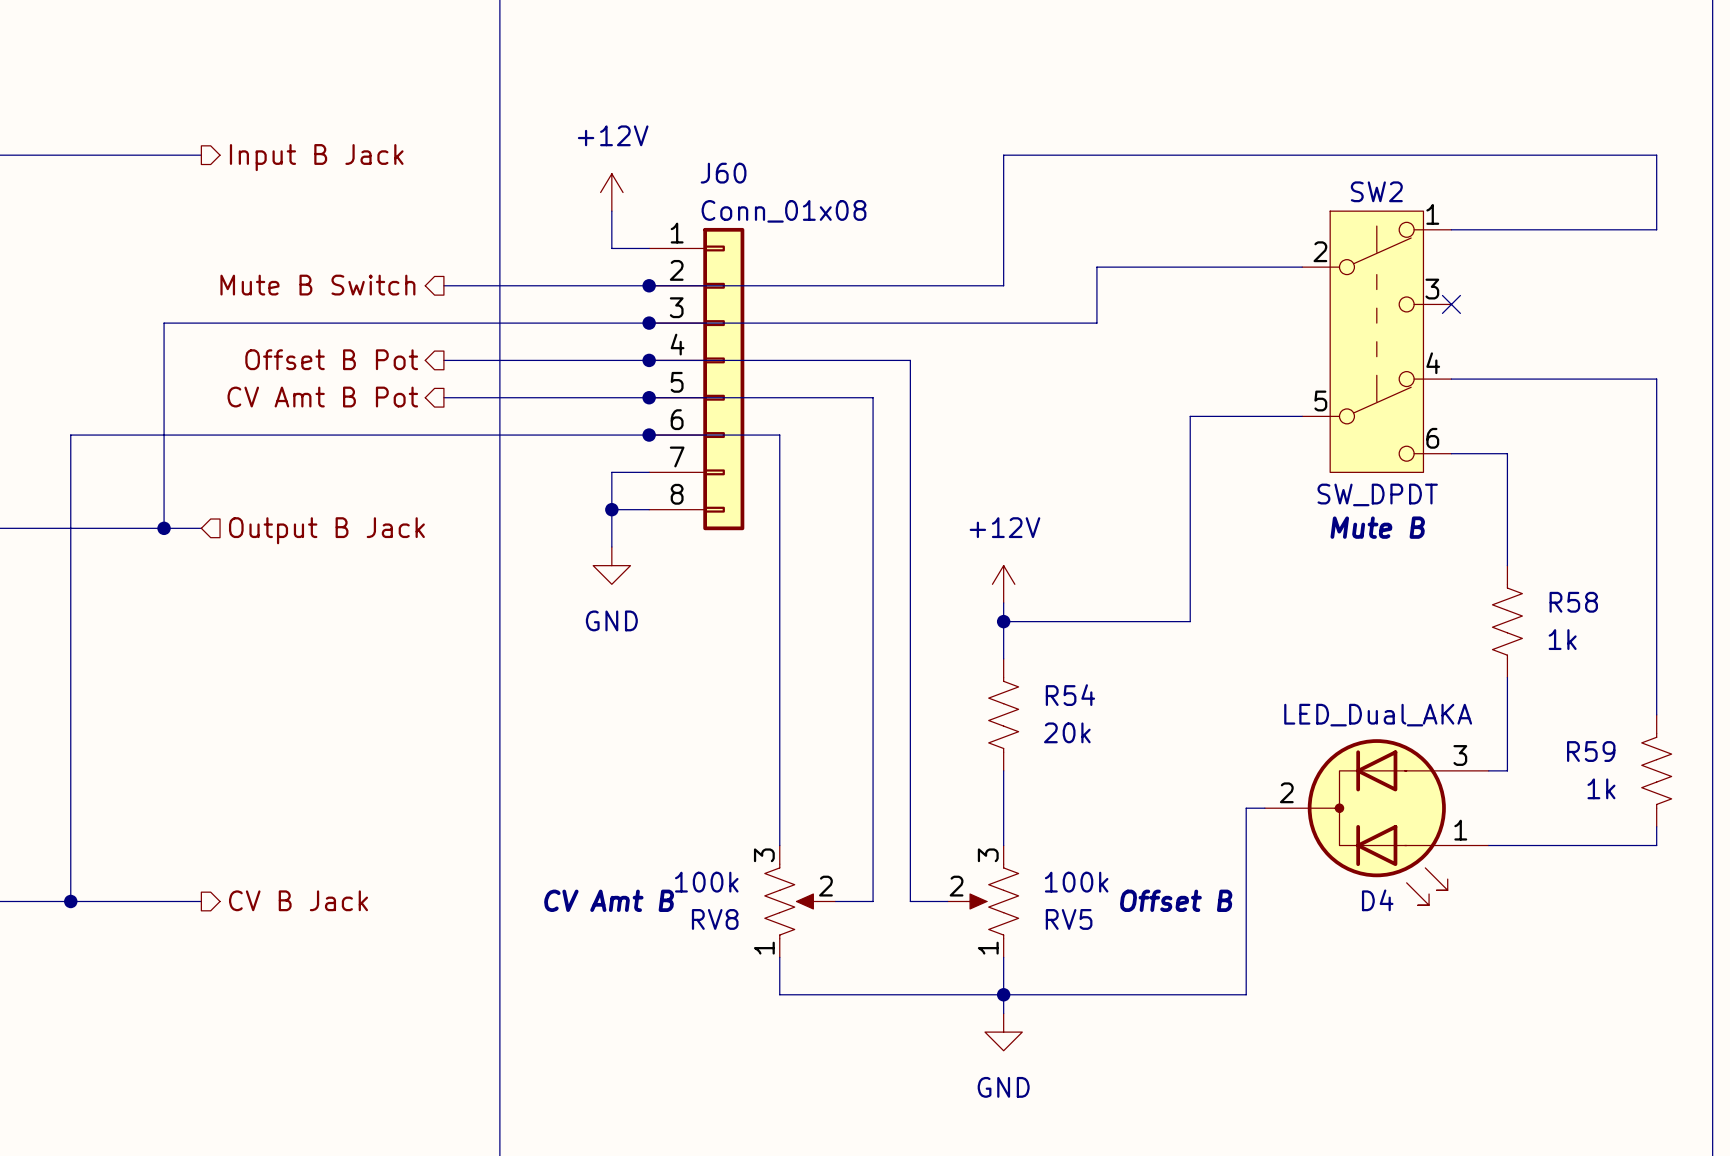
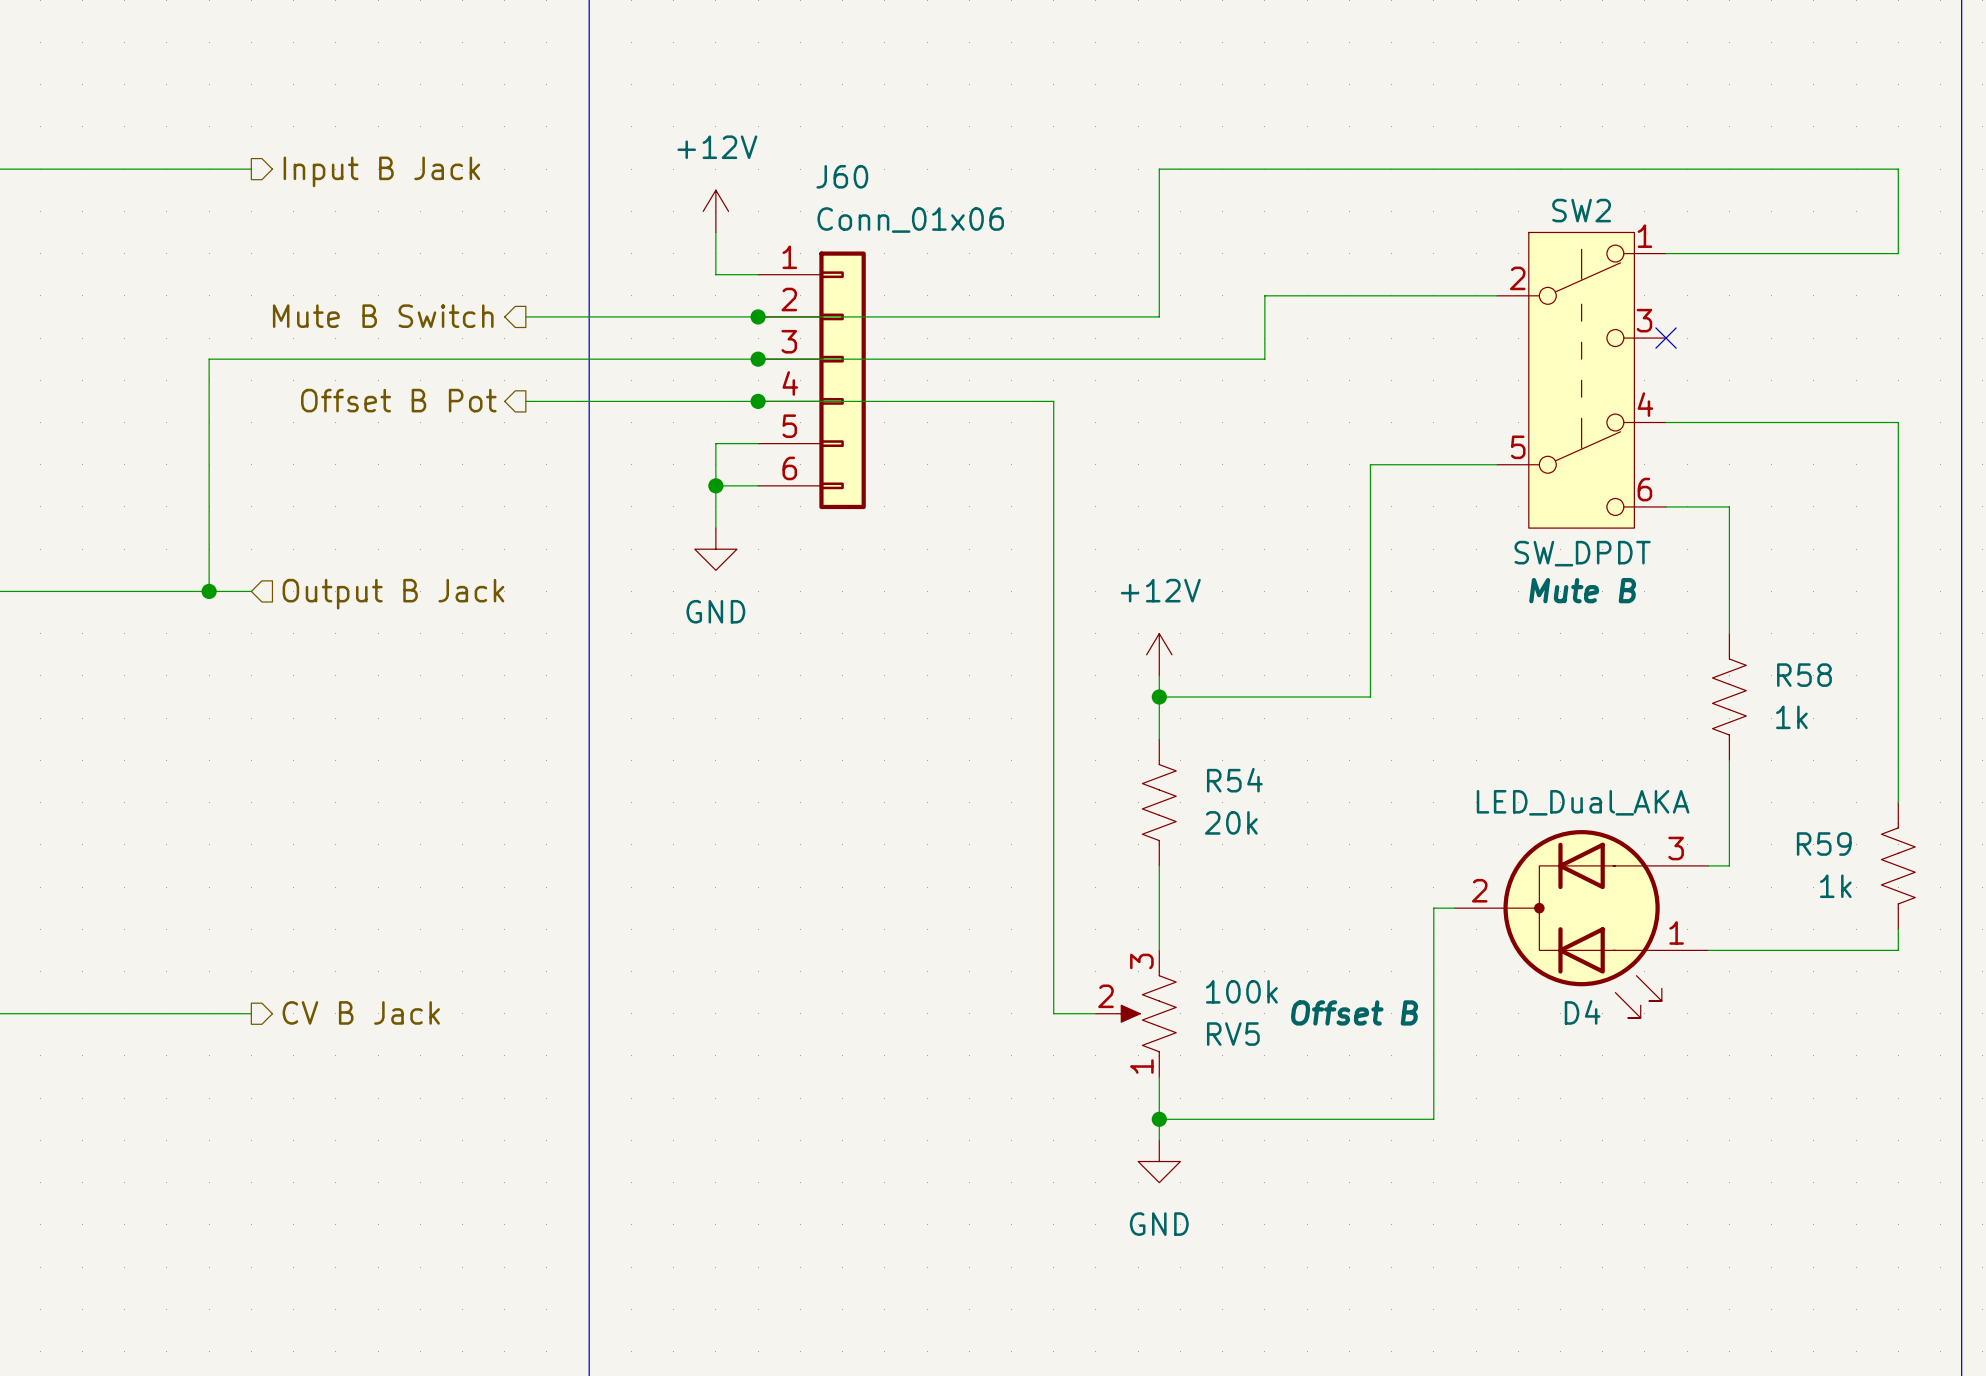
J60 value: Conn_01x08 (783, 211) -> Conn_01x06 (910, 220)
J60 symbol: [649, 227, 745, 531] -> [758, 251, 866, 510]
hierarchical label: CV Amt B Pot (322, 397) -> none
wire: (443, 397) (611, 397) -> (715, 528) (715, 443)
wire: (649, 397) (873, 397) (873, 901) (835, 901) -> none
junction: (649, 397) -> none
wire: (611, 435) (70, 435) (70, 901) -> none
junction: none -> (715, 485)
wire: (649, 435) (779, 435) (779, 845) -> none
junction: (649, 435) -> none
wire: (649, 472) (611, 472) (611, 546) -> none
wire: (611, 509) (649, 509) -> none
junction: (611, 509) -> none
power symbol position: GND (611, 565) -> GND (715, 549)
junction: (70, 901) -> none
RV8: 100k (800, 901) -> none
wire: (779, 957) (779, 994) (1003, 994) -> none

